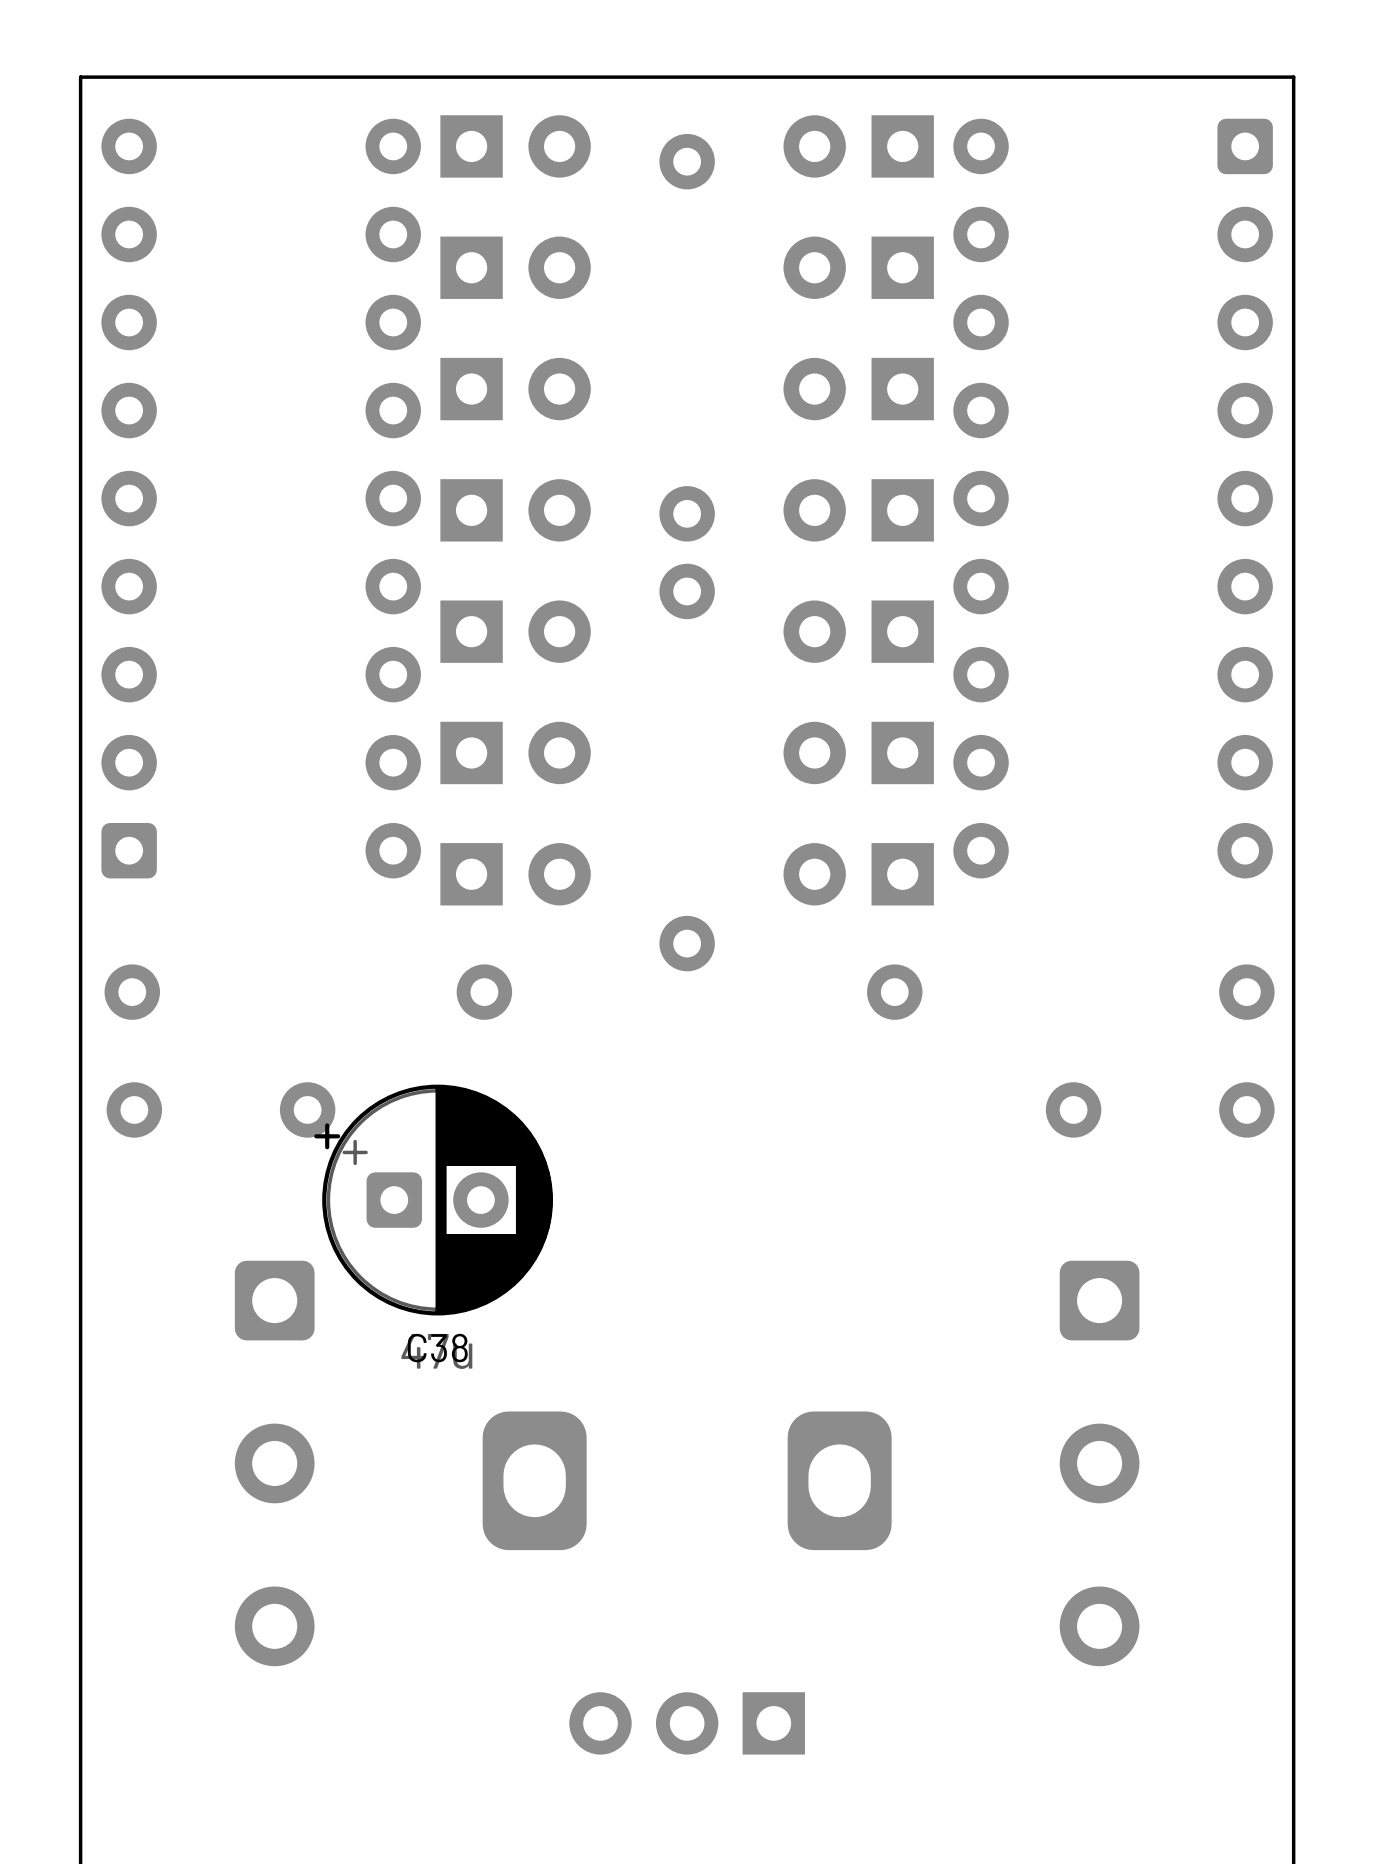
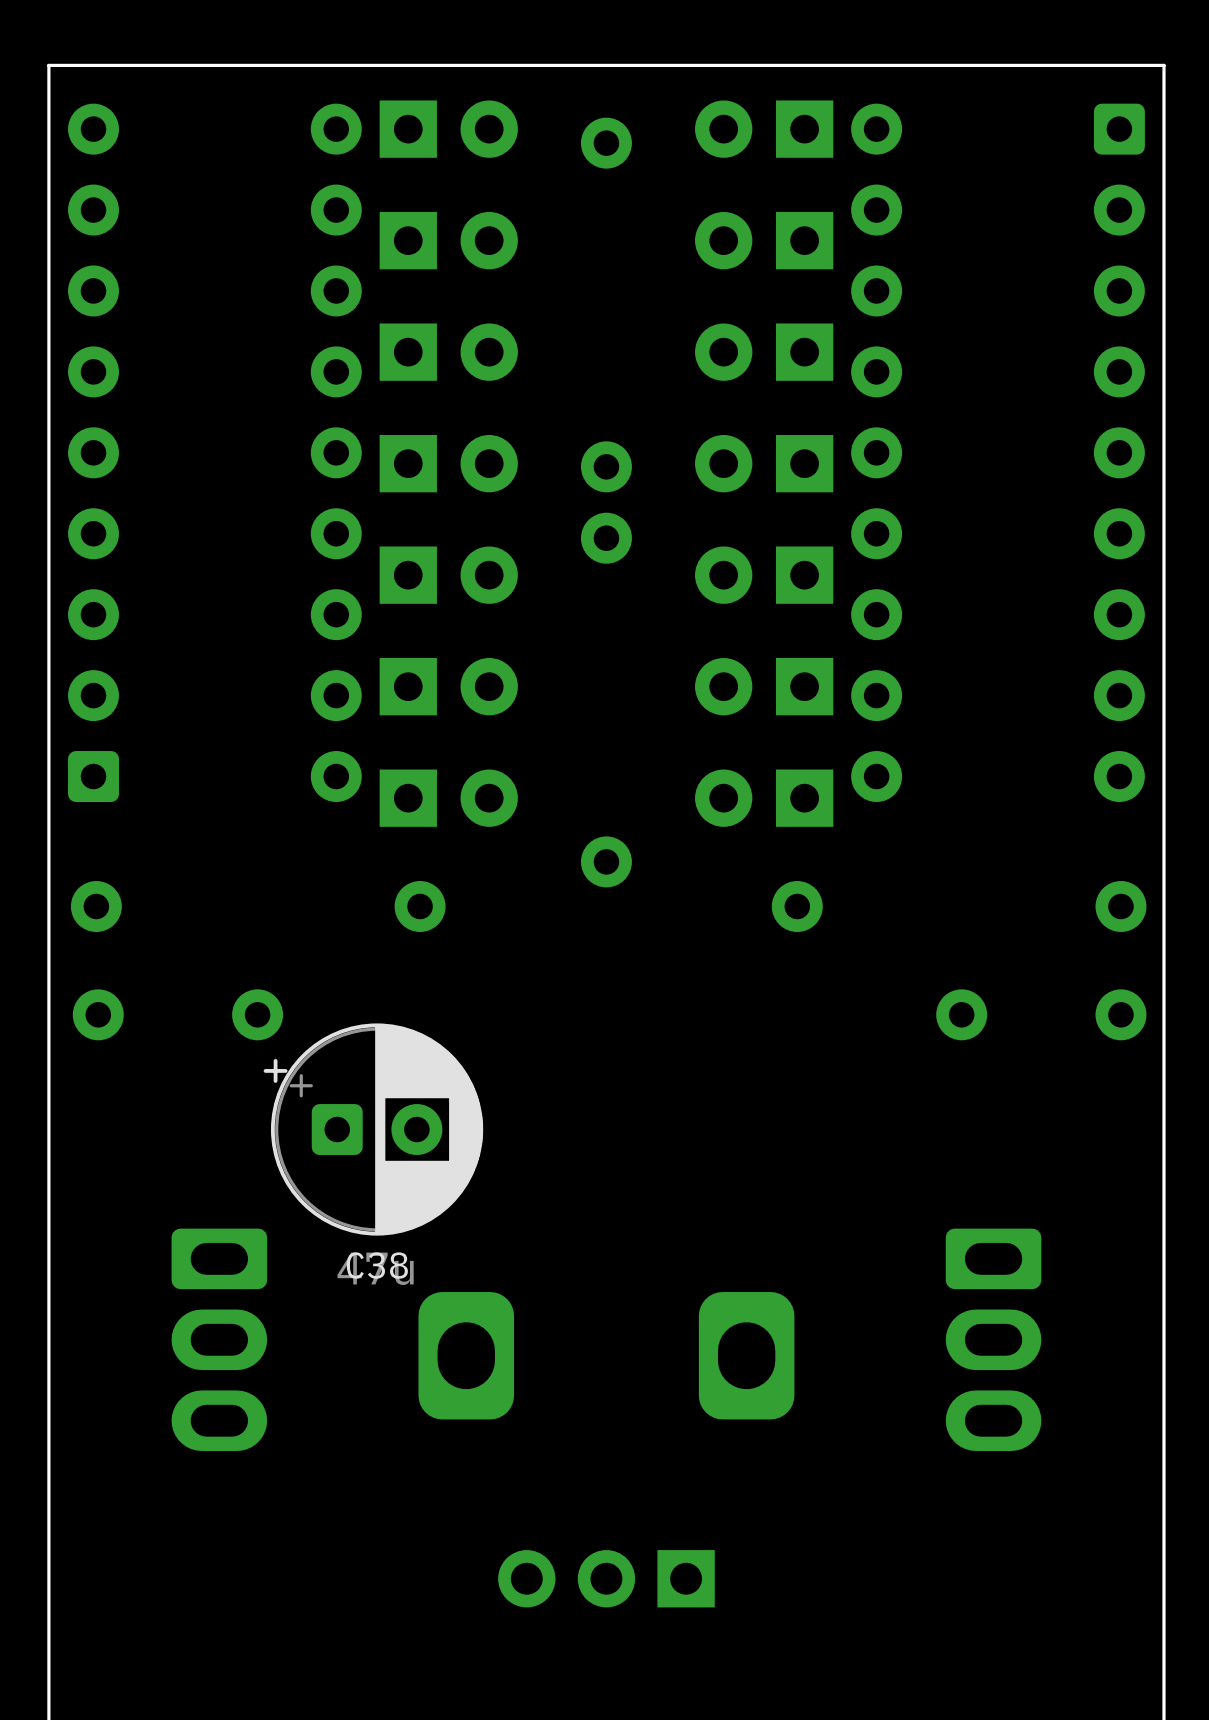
C38 position: (433, 1200) -> (373, 1129)
part footprint: [234, 1260, 315, 1667] -> [171, 1228, 268, 1451]
part footprint: [1059, 1260, 1140, 1667] -> [945, 1228, 1042, 1451]

